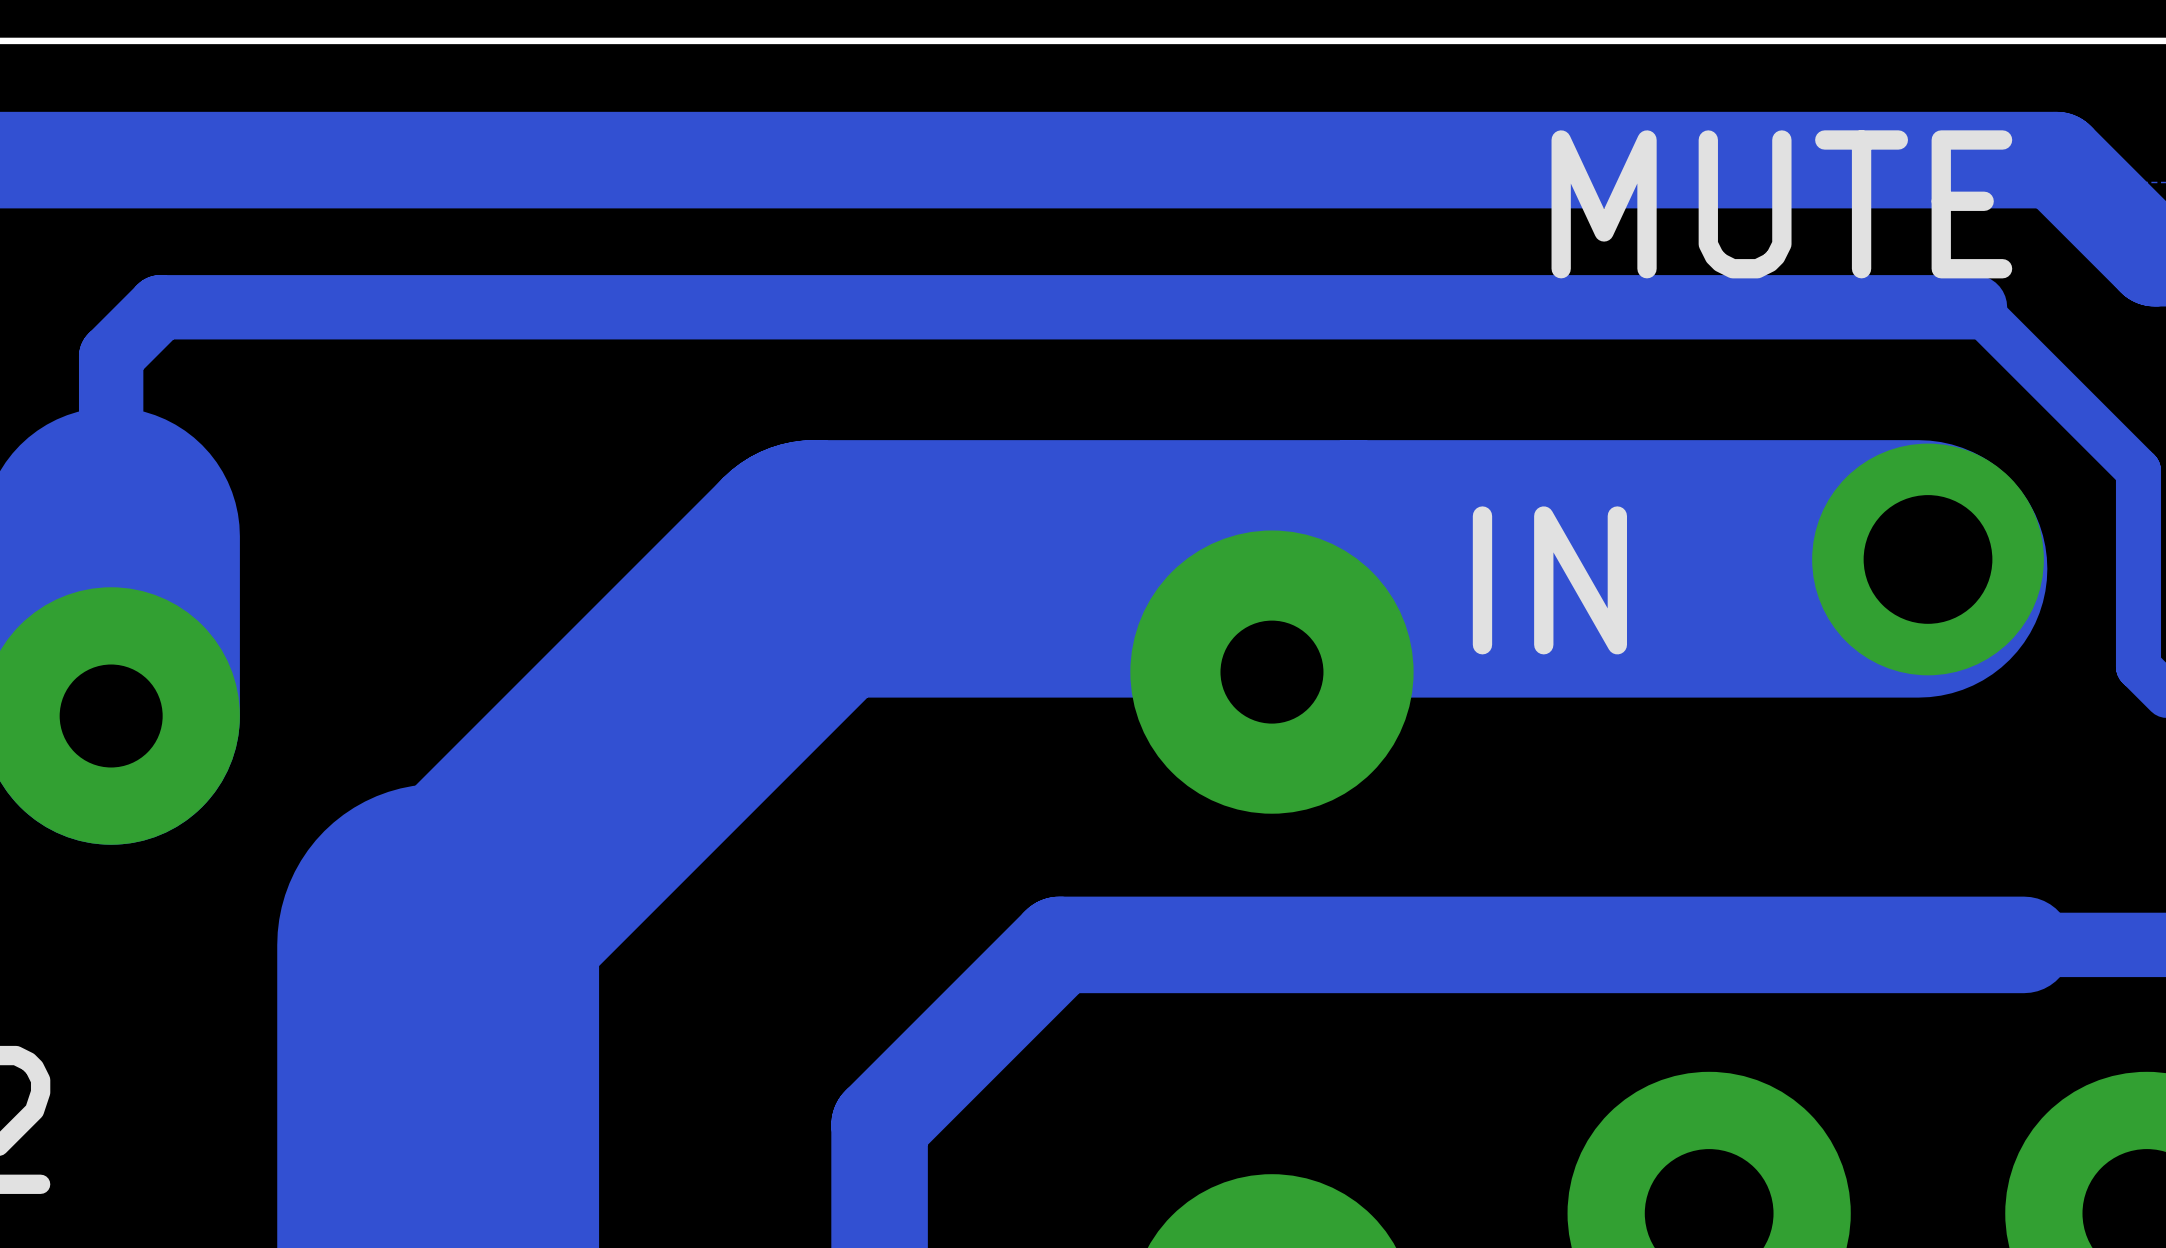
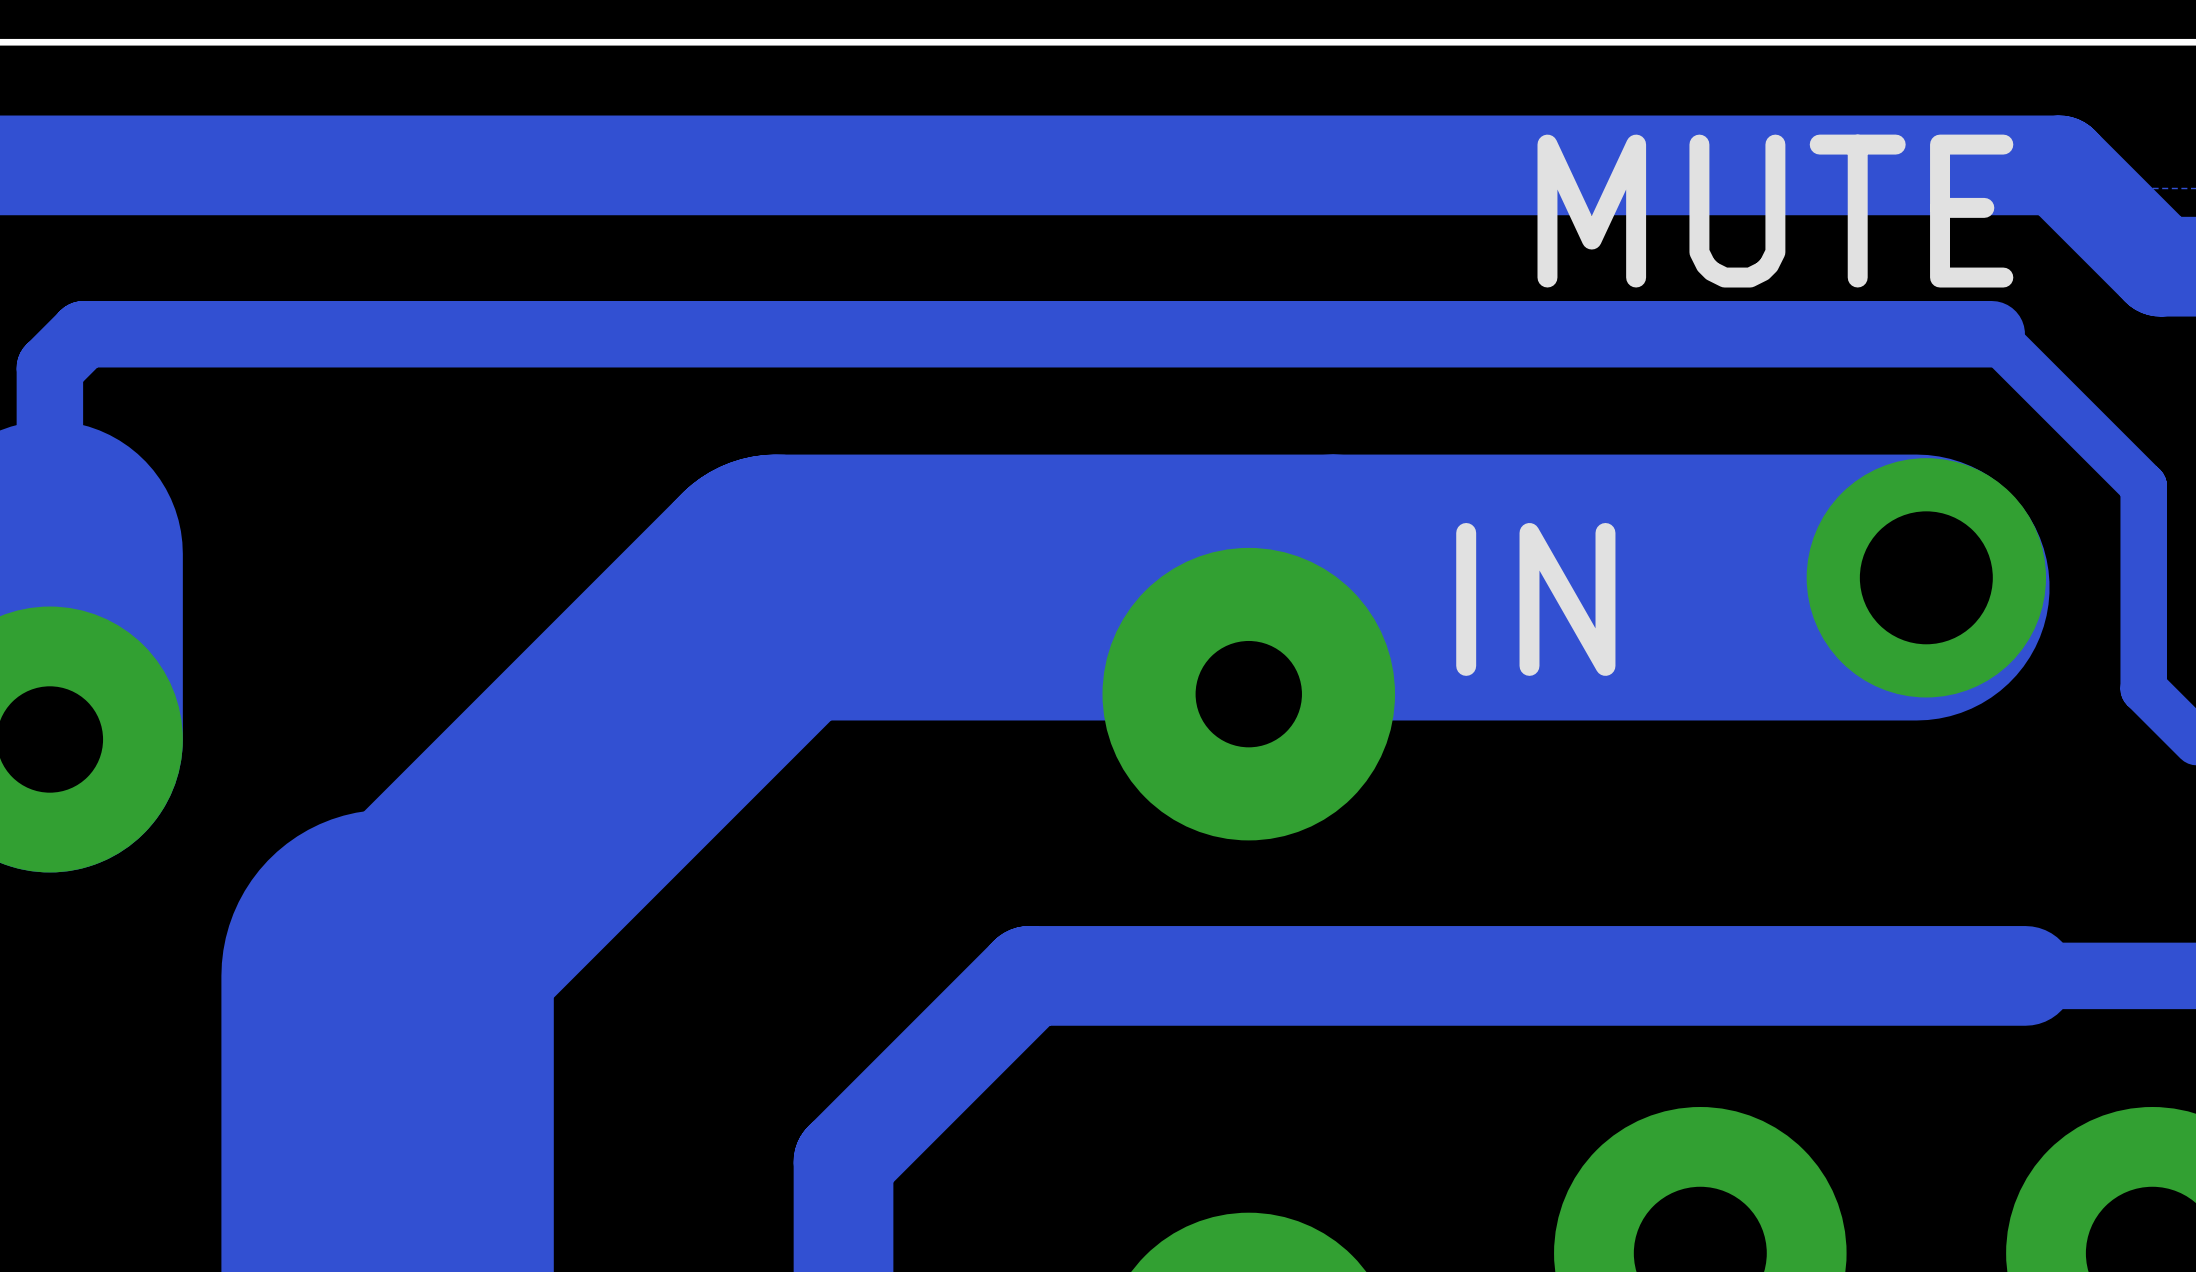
bottom track: (1991, 323) (1975, 307) (160, 307) (143, 323) -> (1991, 334) (83, 334)

